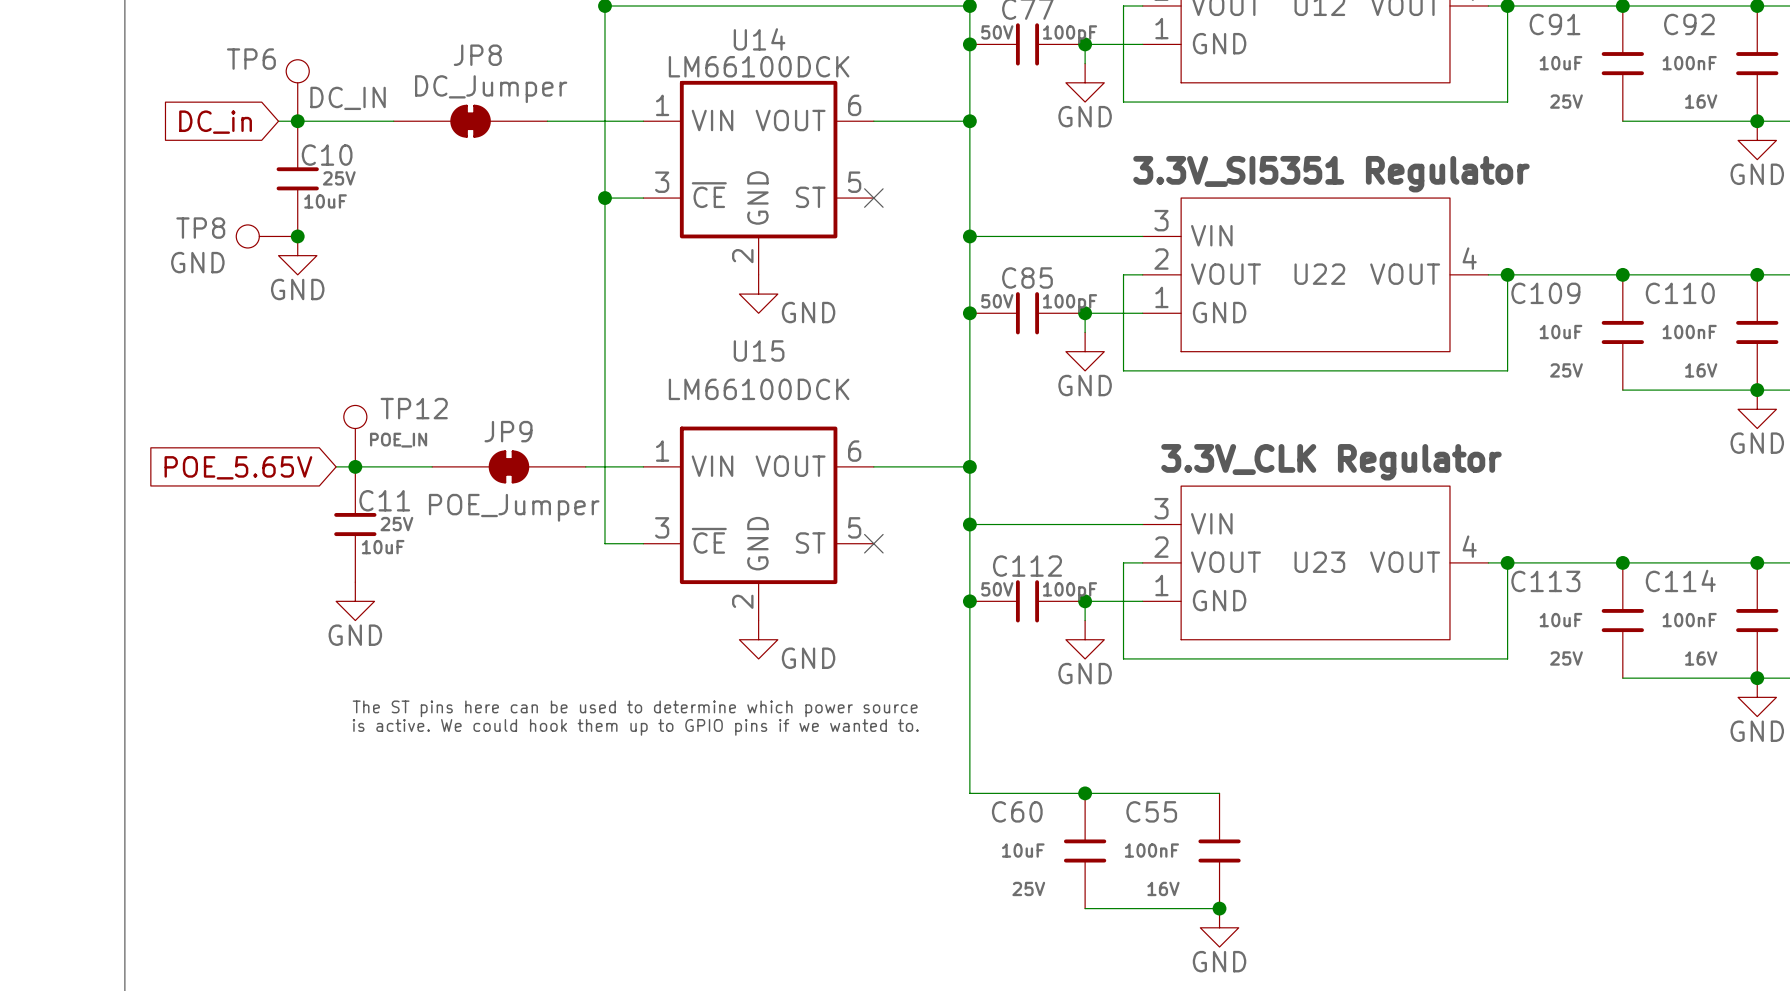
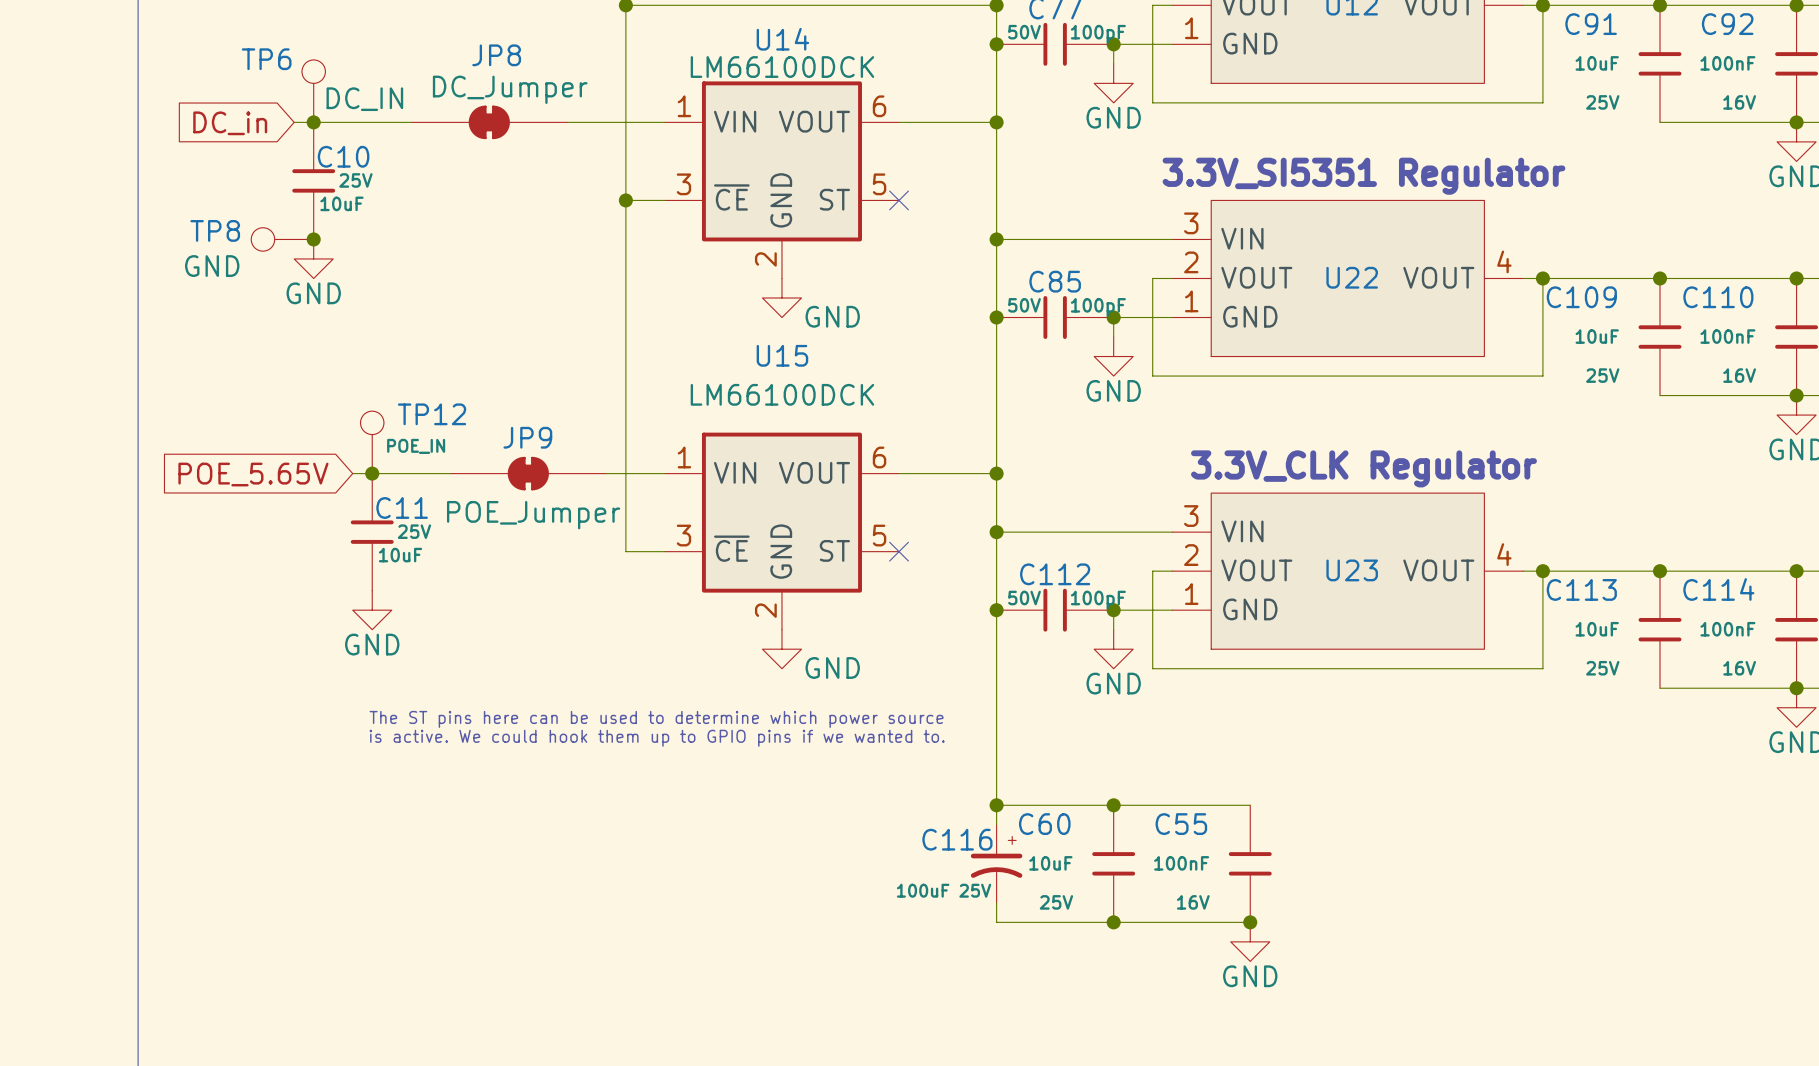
wire: none -> (996, 805) (996, 824)
junction: none -> (996, 805)
C116: none -> 100uF 25V (996, 863)
wire: none -> (996, 902) (996, 922) (1113, 922)
junction: none -> (1113, 922)

